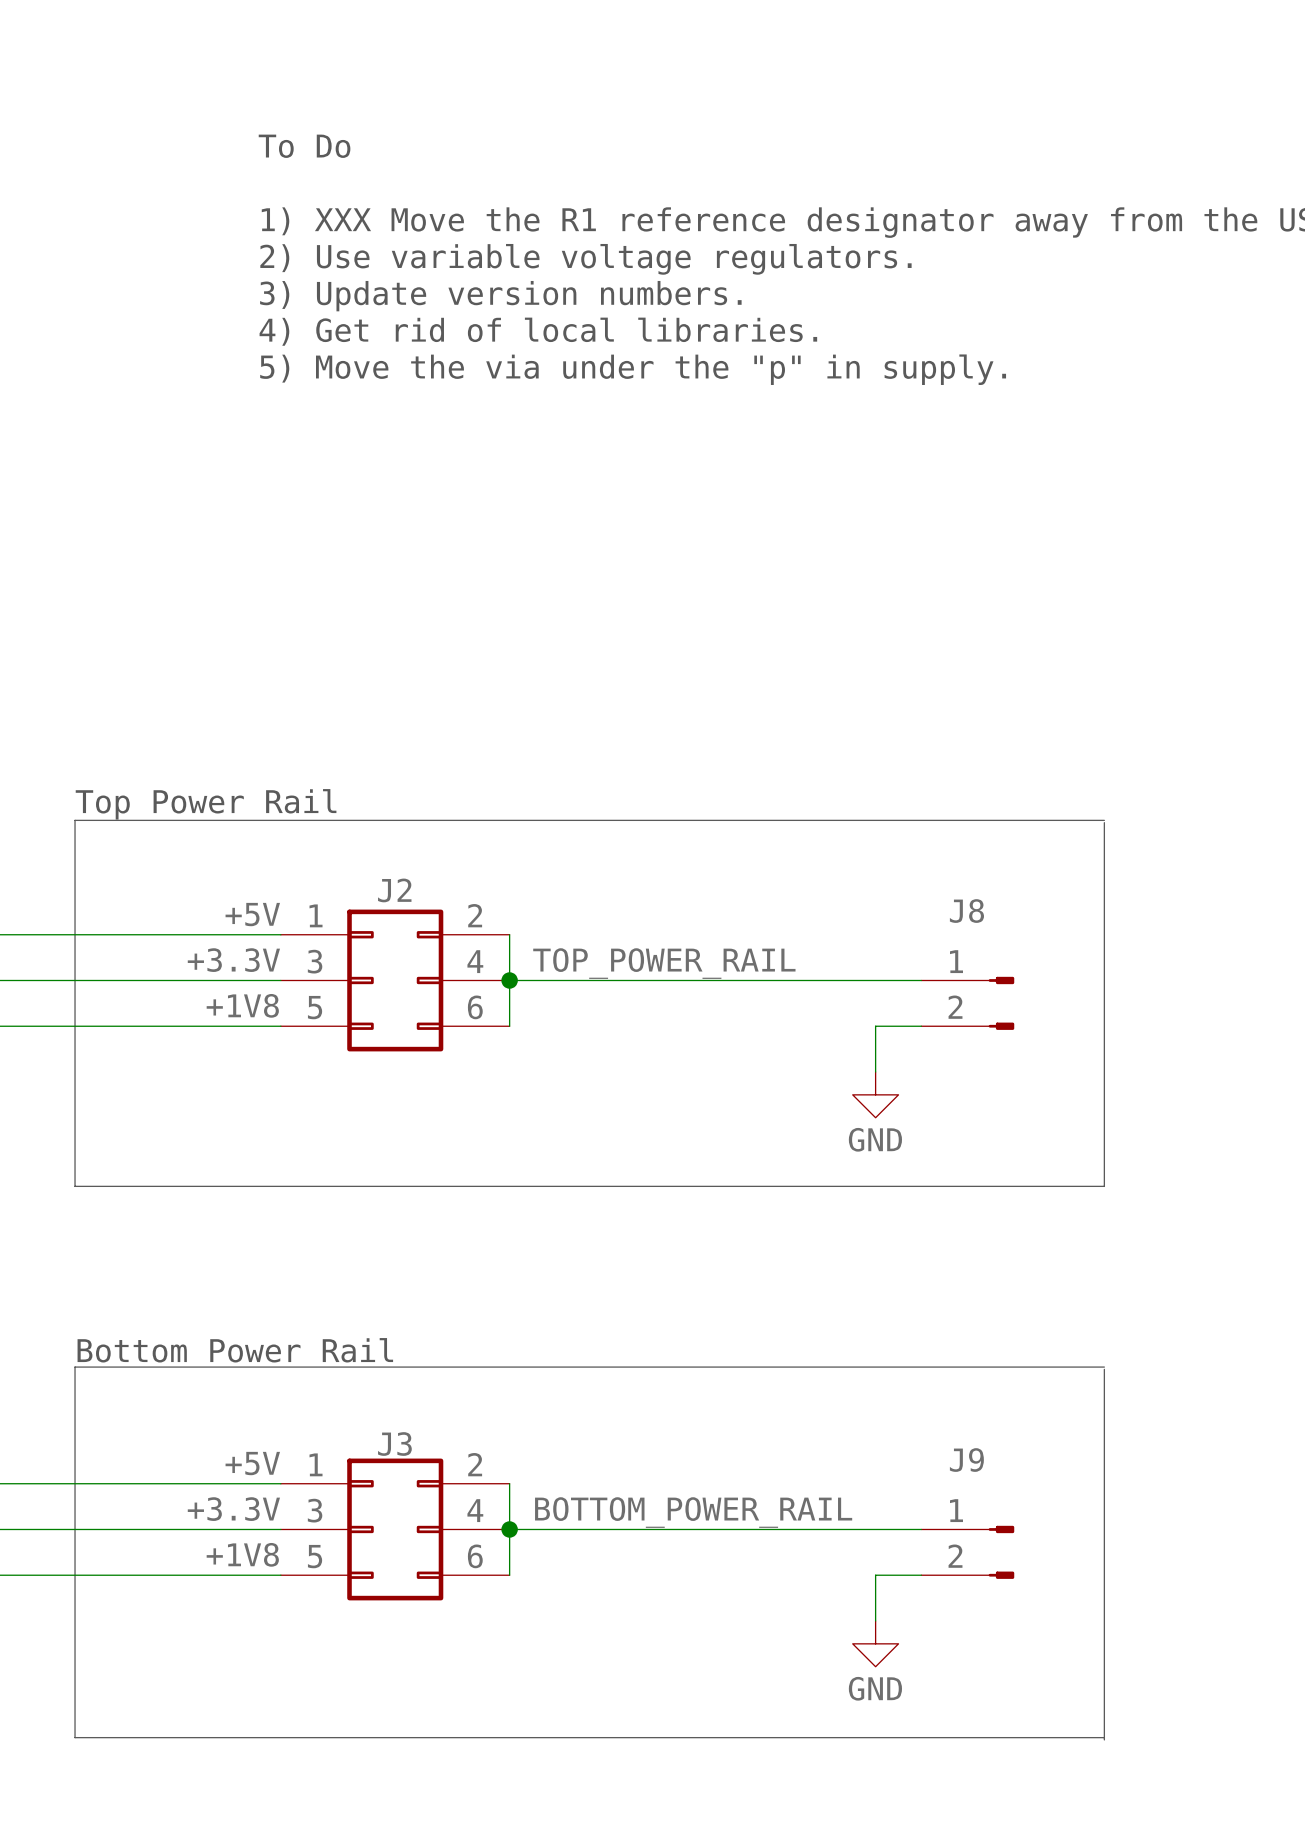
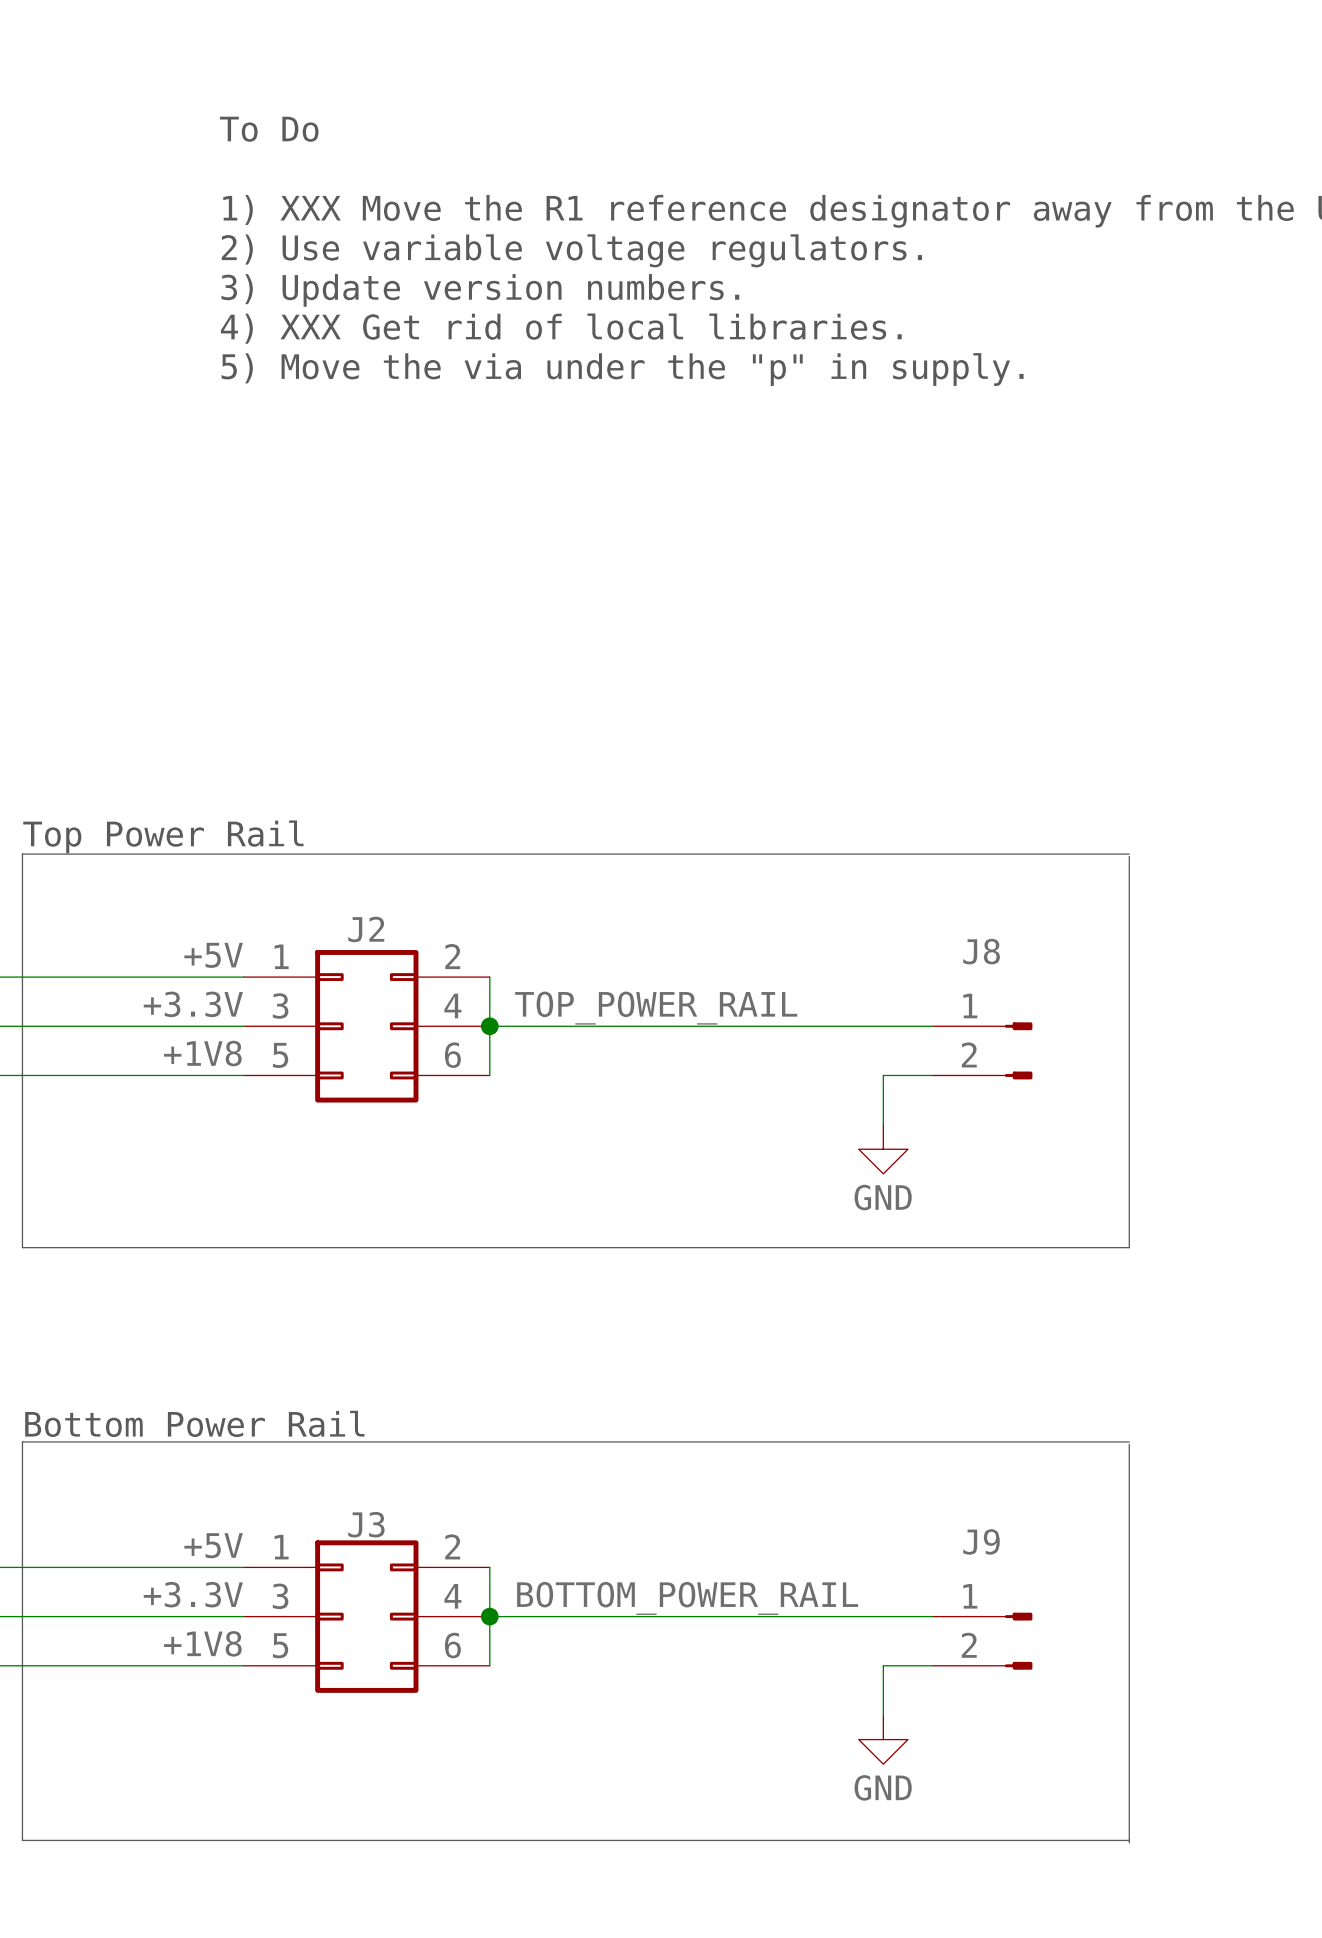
text: 4) Get rid of local libraries. (538, 331) -> 4) XXX Get rid of local libraries. (561, 328)

